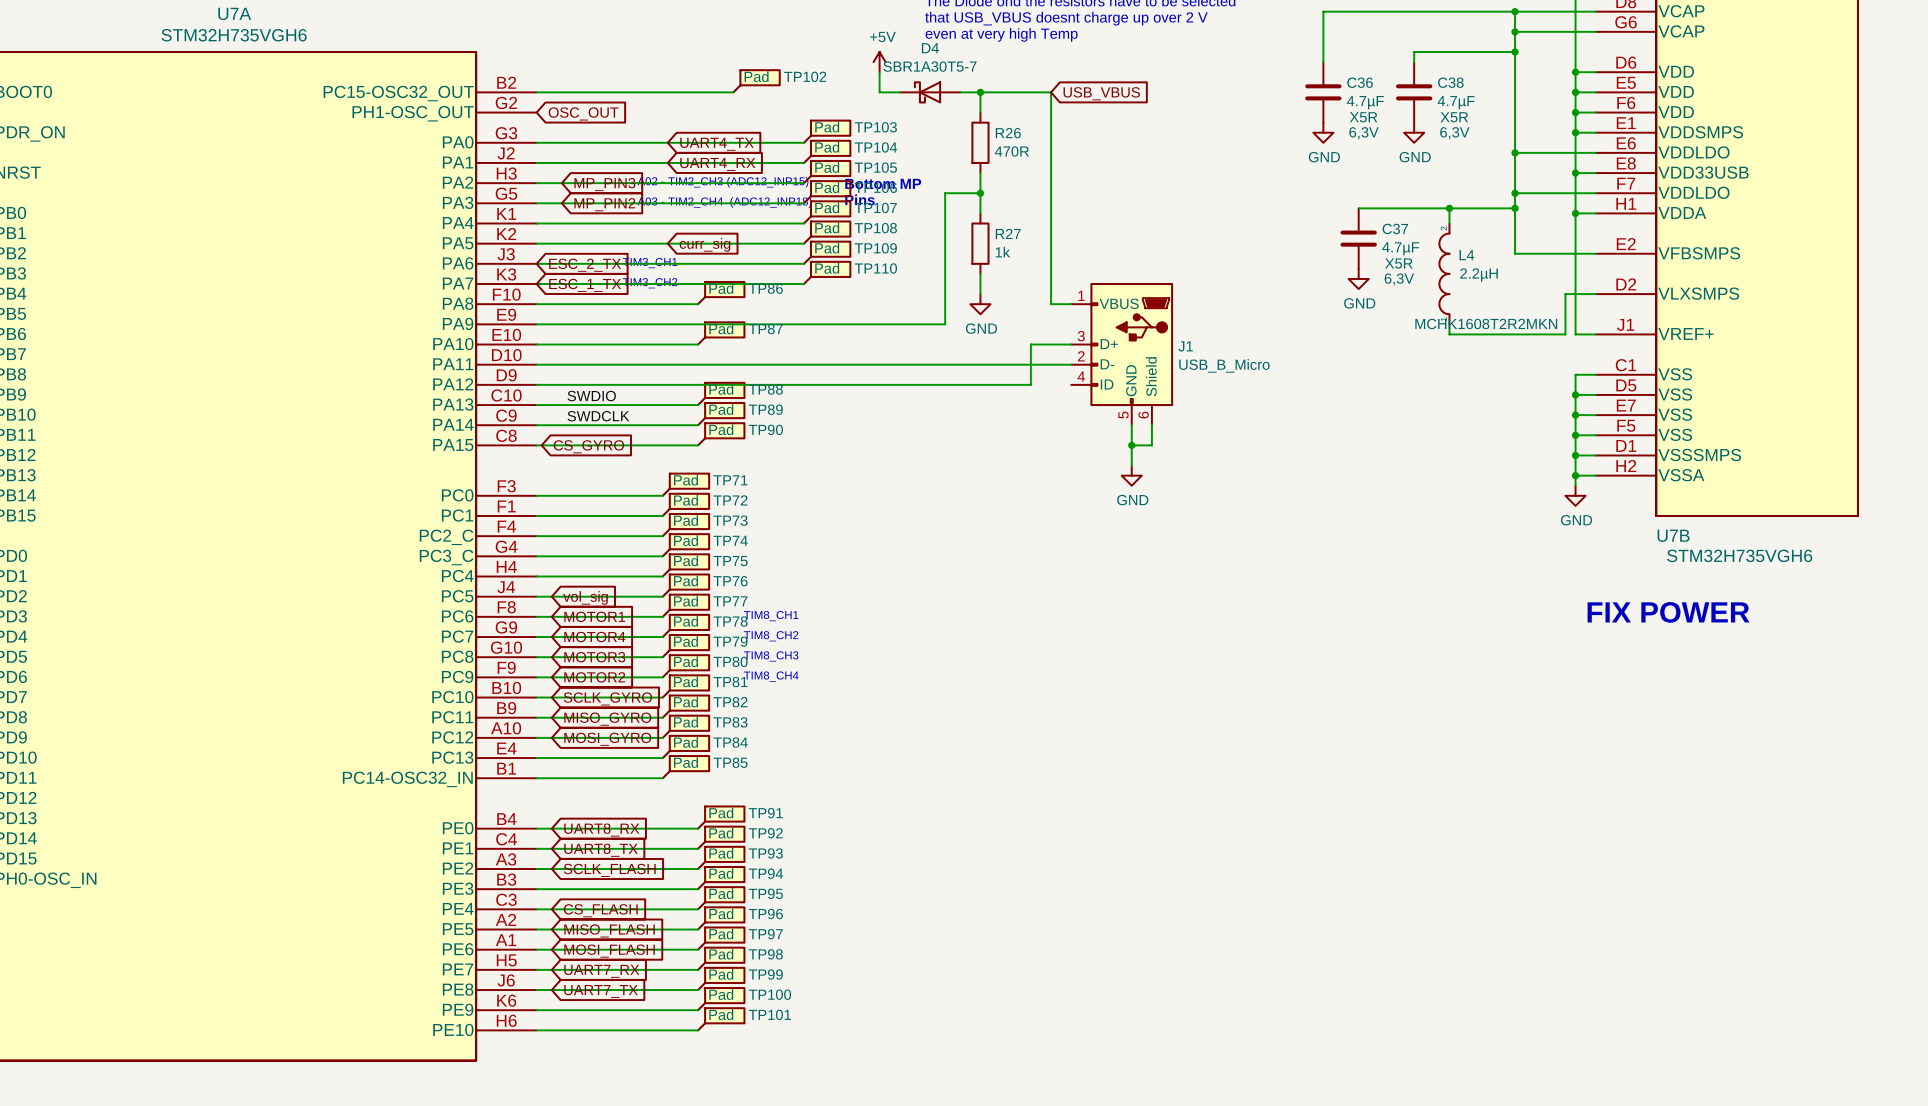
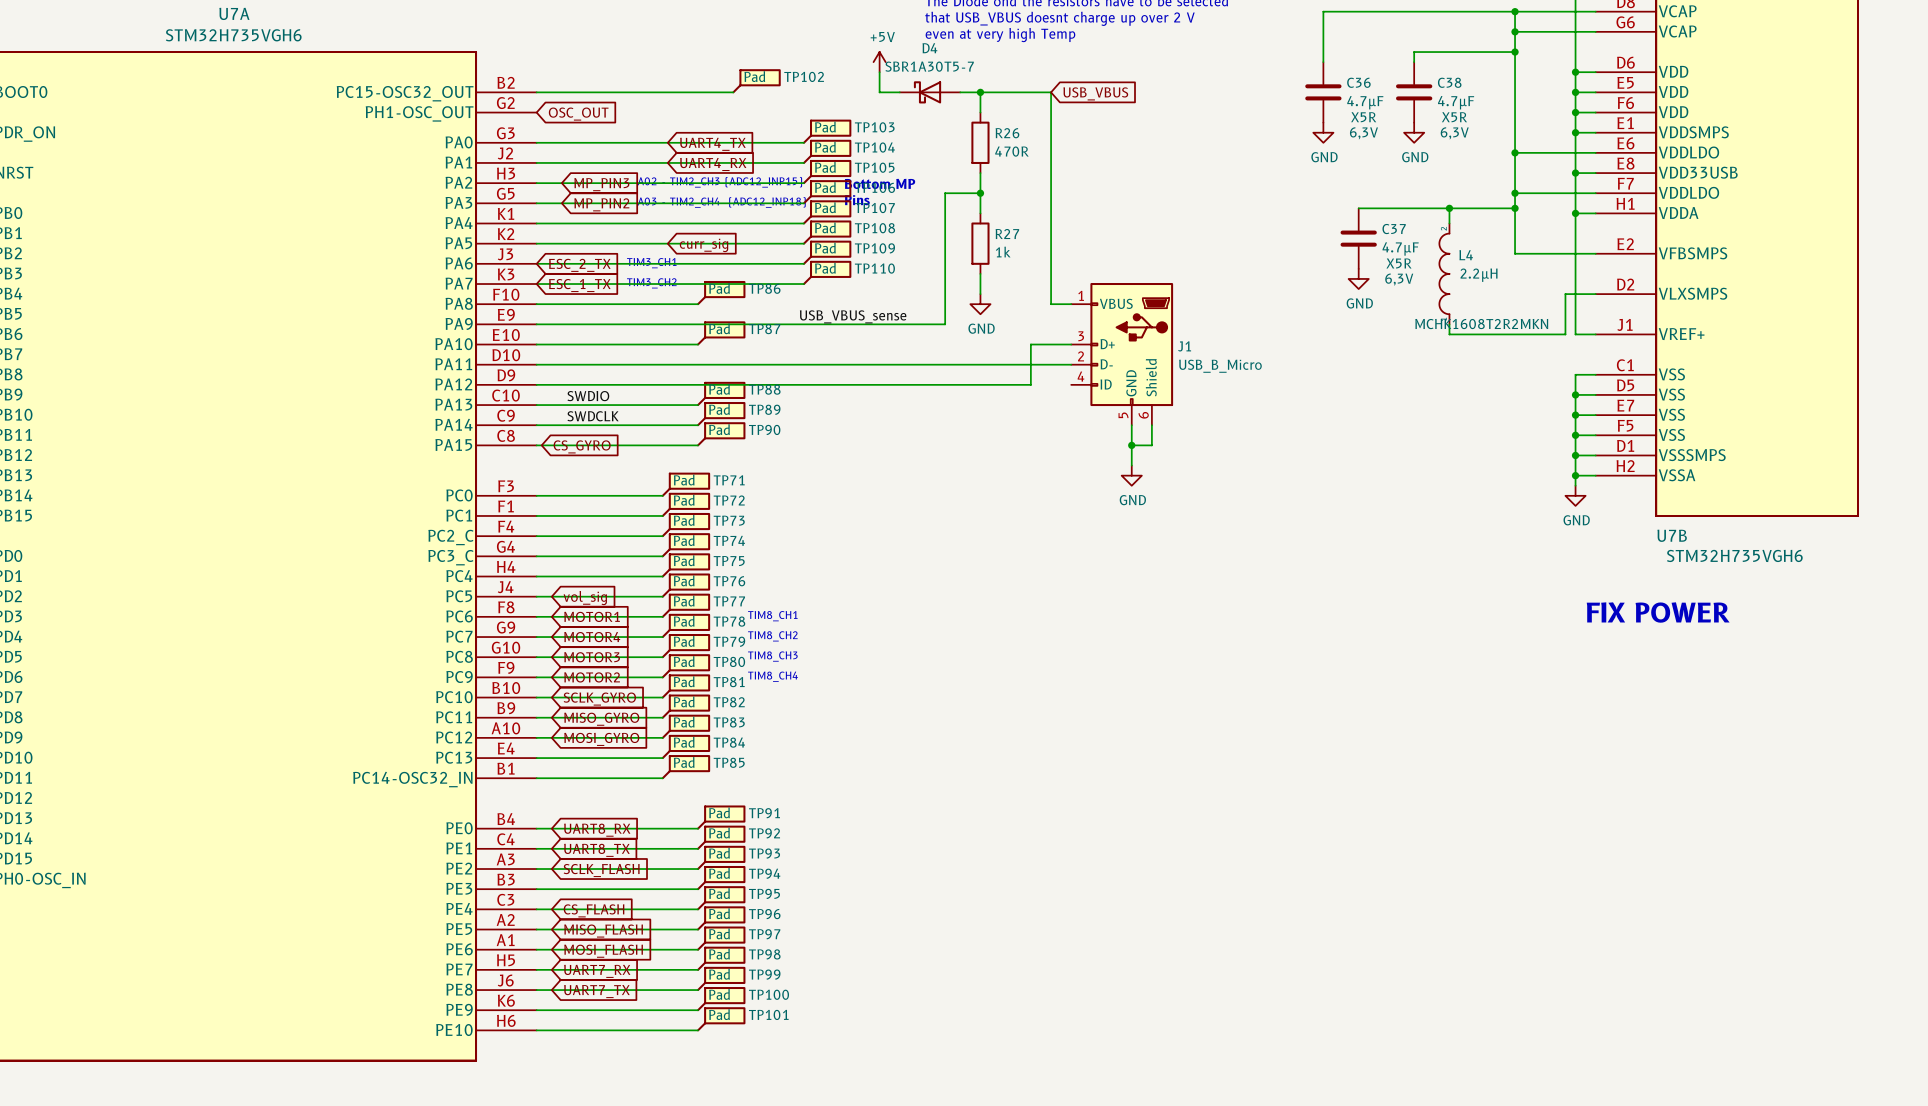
label: none -> USB_VBUS_sense (853, 316)

